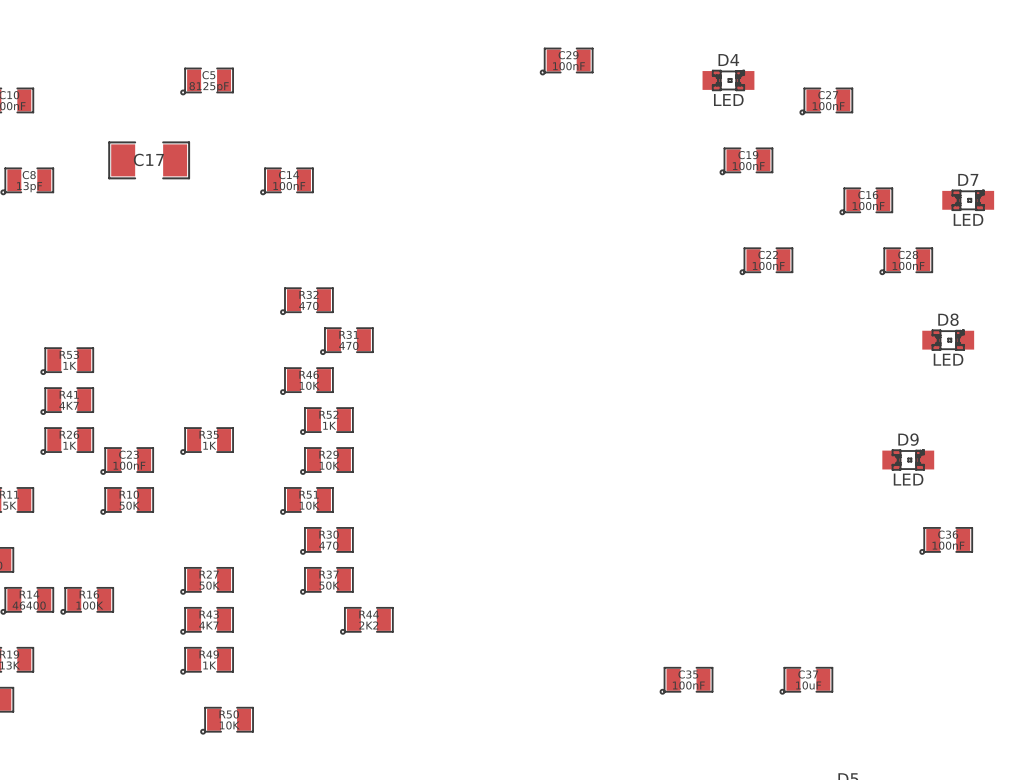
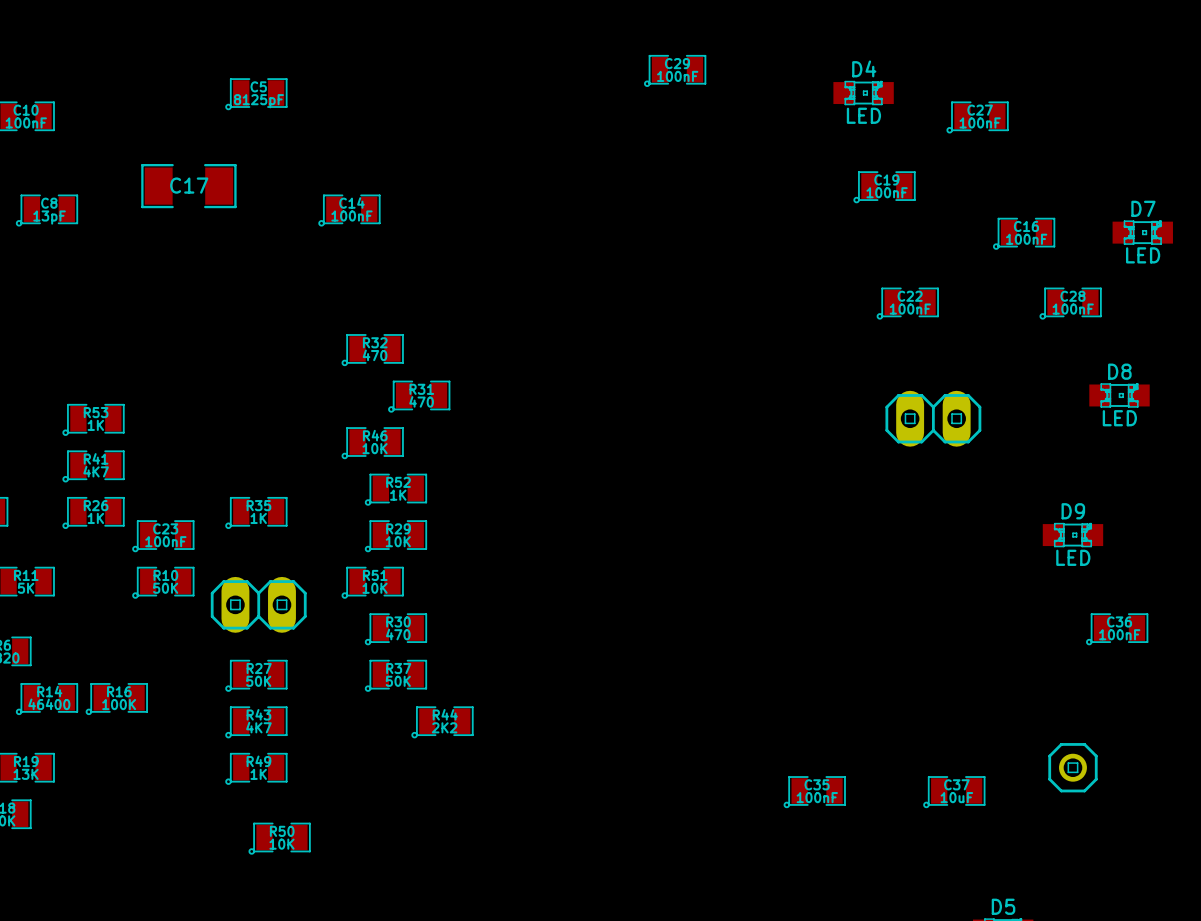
part: none -> (933, 418)
part: none -> (258, 604)
part: none -> (1072, 767)

